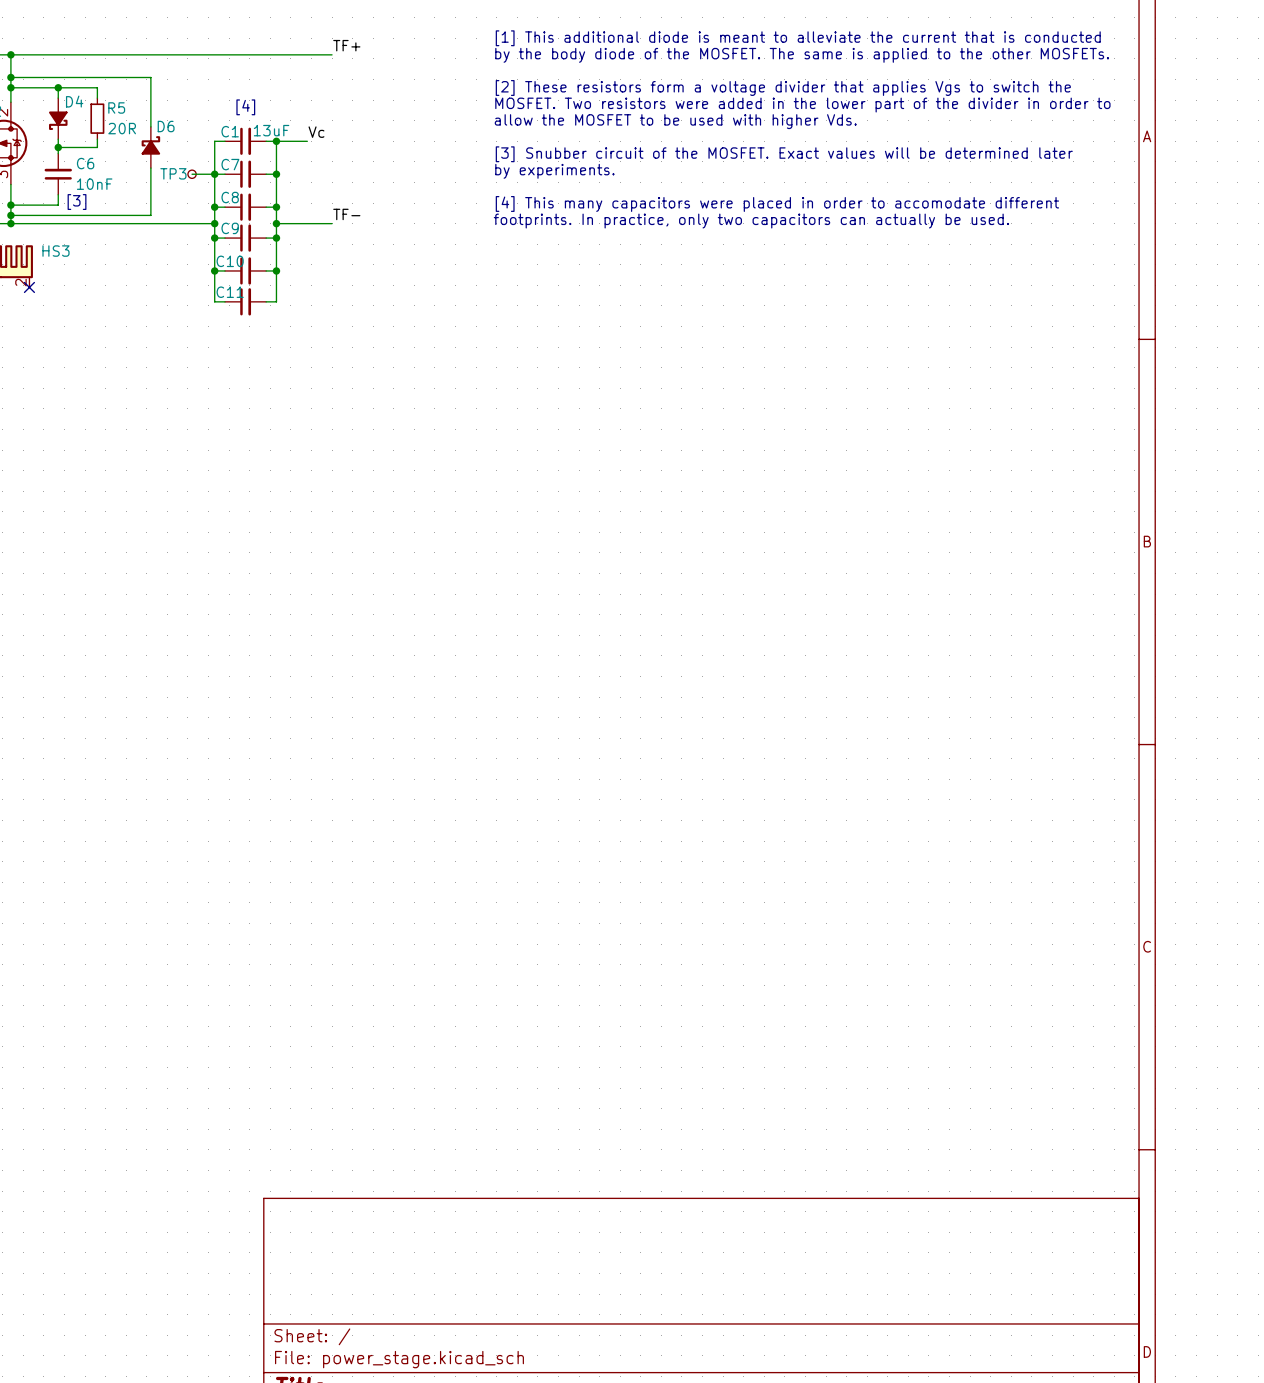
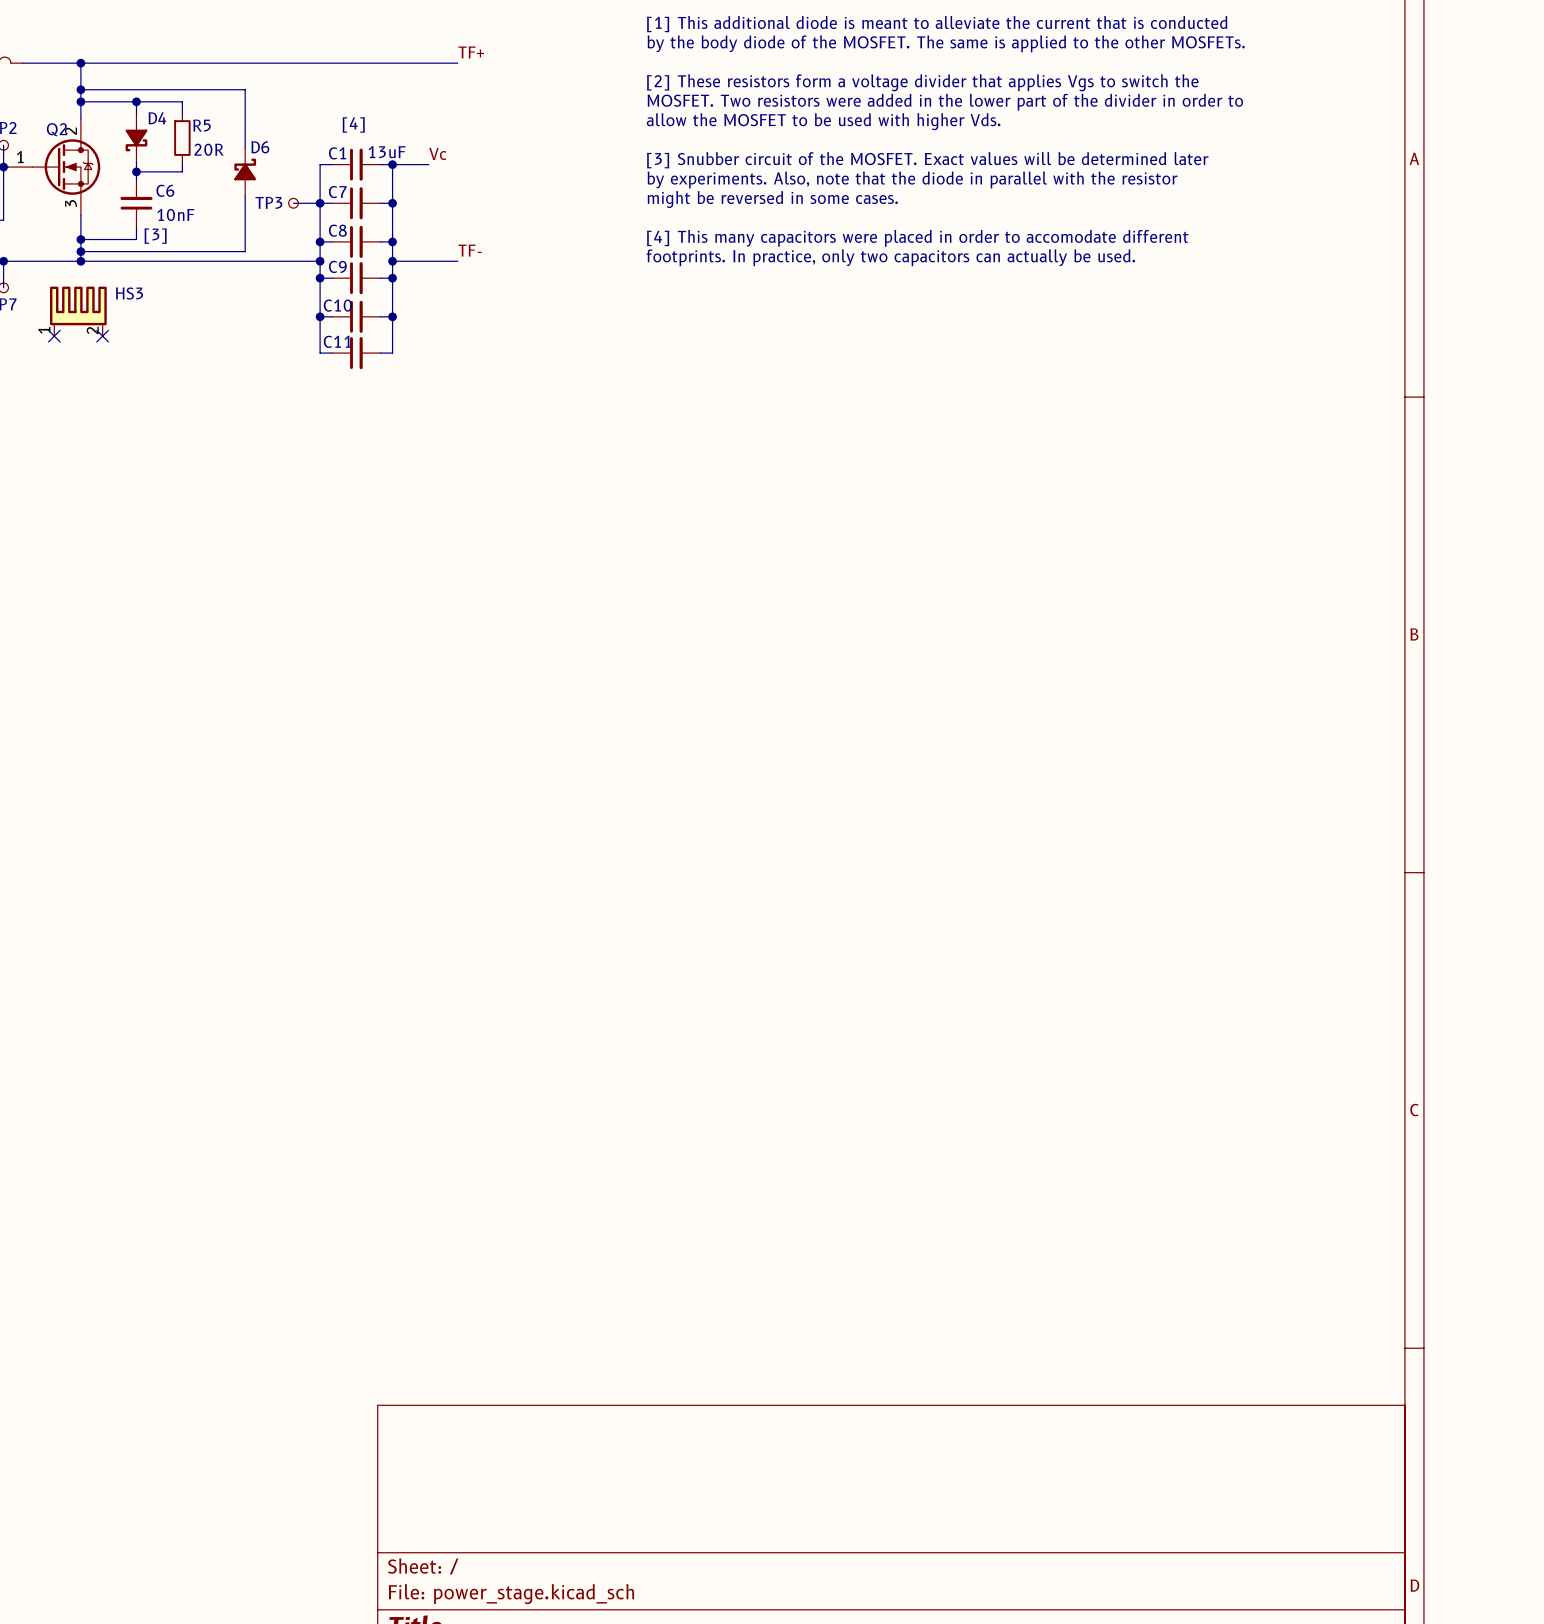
text: none -> [1] This additional diode is meant to alleviate the current that is conducted (937, 24)
text: [1] This additional diode is meant to alleviate the current that is conducted (798, 38) -> by the body diode of the MOSFET. The same is applied to the other MOSFETs. (946, 43)
text: by the body diode of the MOSFET. The same is applied to the other MOSFETs. (802, 55) -> none
text: none -> [2] These resistors form a voltage divider that applies Vgs to switch the (922, 82)
text: [2] These resistors form a voltage divider that applies Vgs to switch the (783, 87) -> MOSFET. Two resistors were added in the lower part of the divider in order to (945, 102)
text: MOSFET. Two resistors were added in the lower part of the divider in order to (802, 105) -> allow the MOSFET to be used with higher Vds. (823, 121)
text: allow the MOSFET to be used with higher Vds. (675, 121) -> none
text: none -> [3] Snubber circuit of the MOSFET. Exact values will be determined later (927, 160)
text: [3] Snubber circuit of the MOSFET. Exact values will be determined later (784, 154) -> by experiments. Also, note that the diode in parallel with the resistor (912, 180)
text: by experiments. (554, 171) -> might be reversed in some cases. (772, 199)

